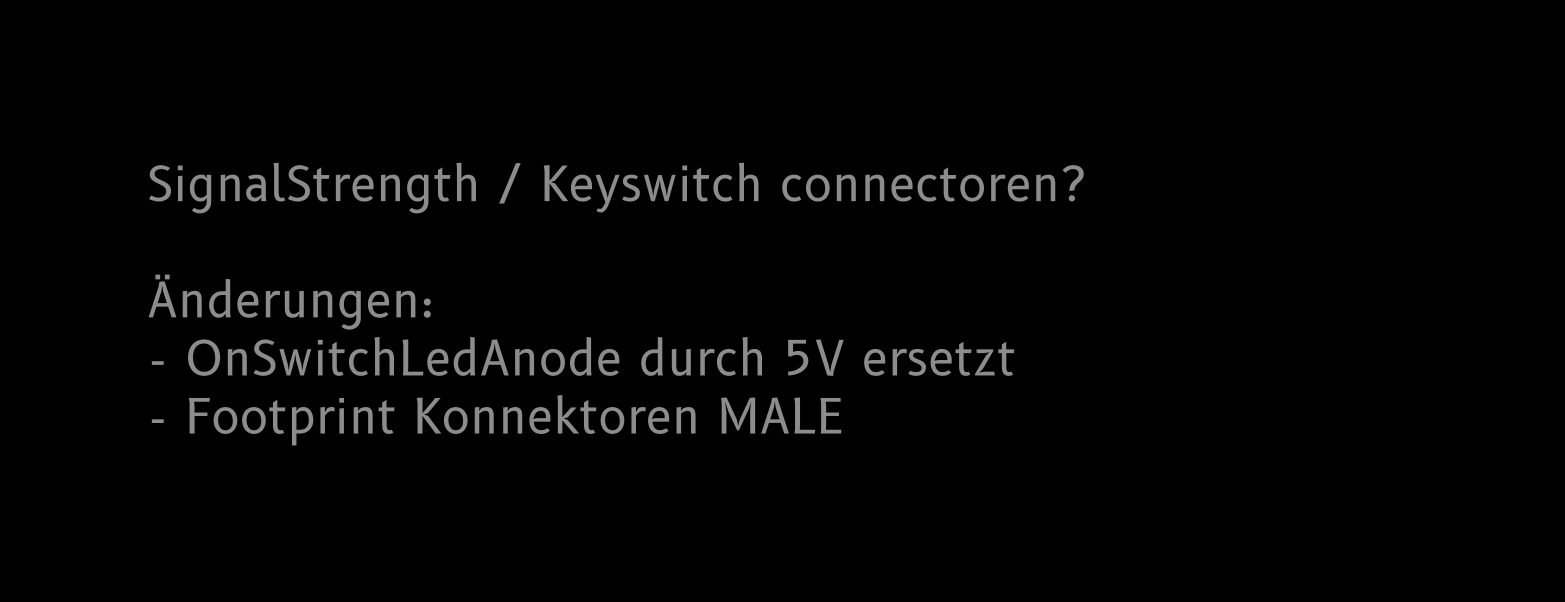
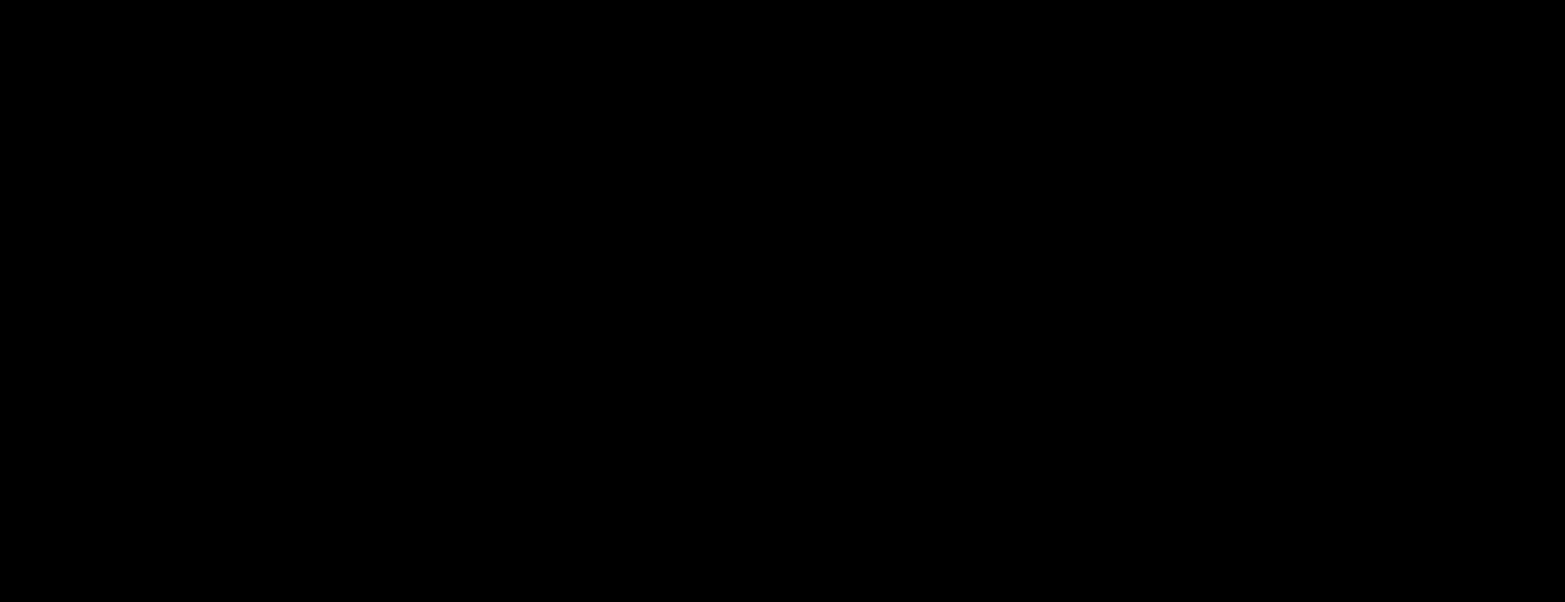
text: SignalStrength / Keyswitch connectoren? (616, 188) -> none
text: Änderungen: (289, 302) -> none
text: - OnSwitchLedAnode durch 5V ersetzt (583, 356) -> none
text: - Footprint Konnektoren MALE (496, 420) -> none

